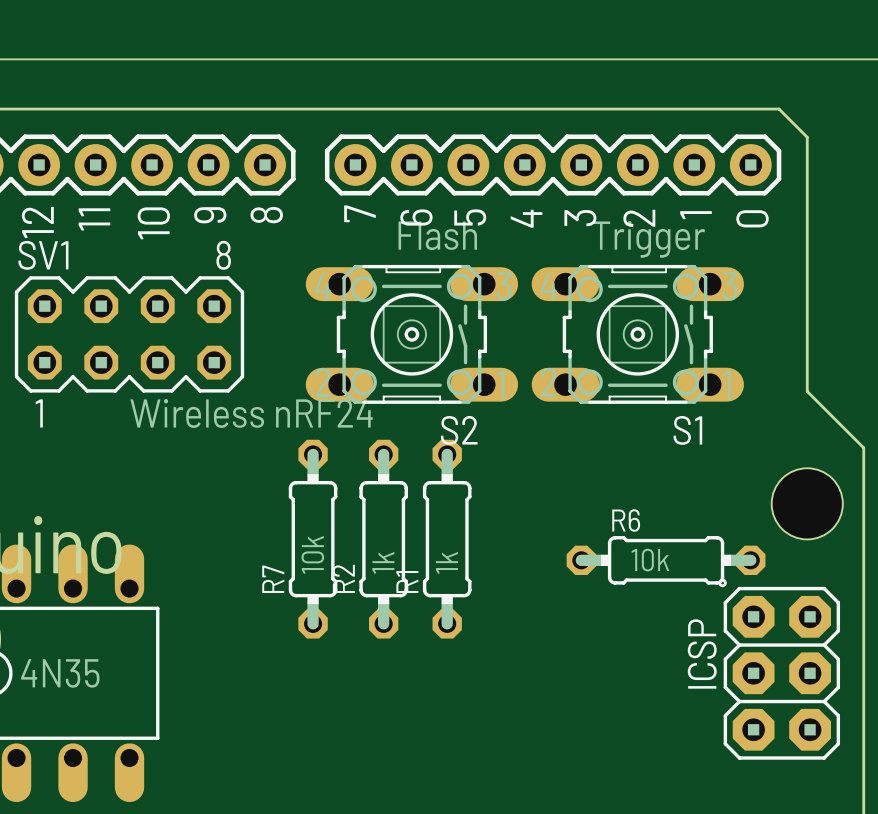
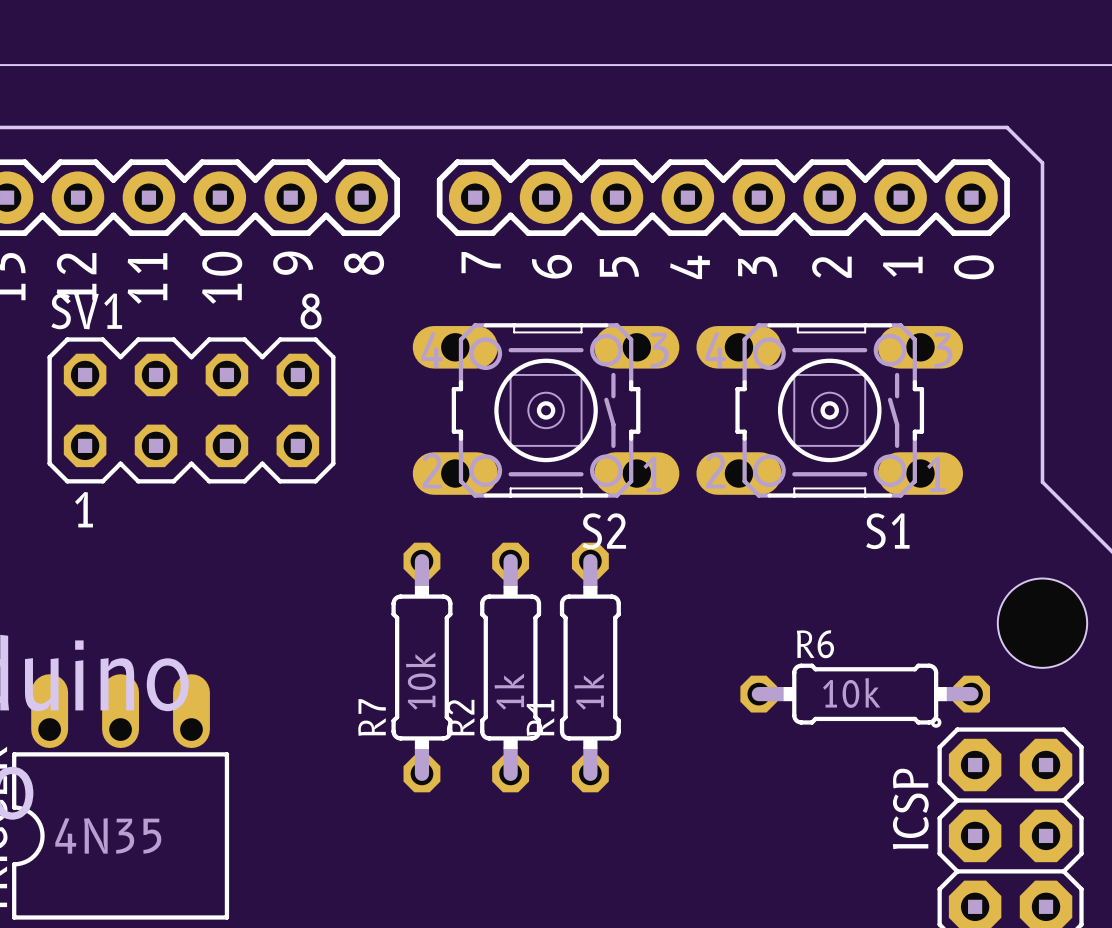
S2 value: Flash (437, 235) -> none
S1 value: Trigger (648, 239) -> none
SV1 value: Wireless nRF24 (251, 413) -> none

